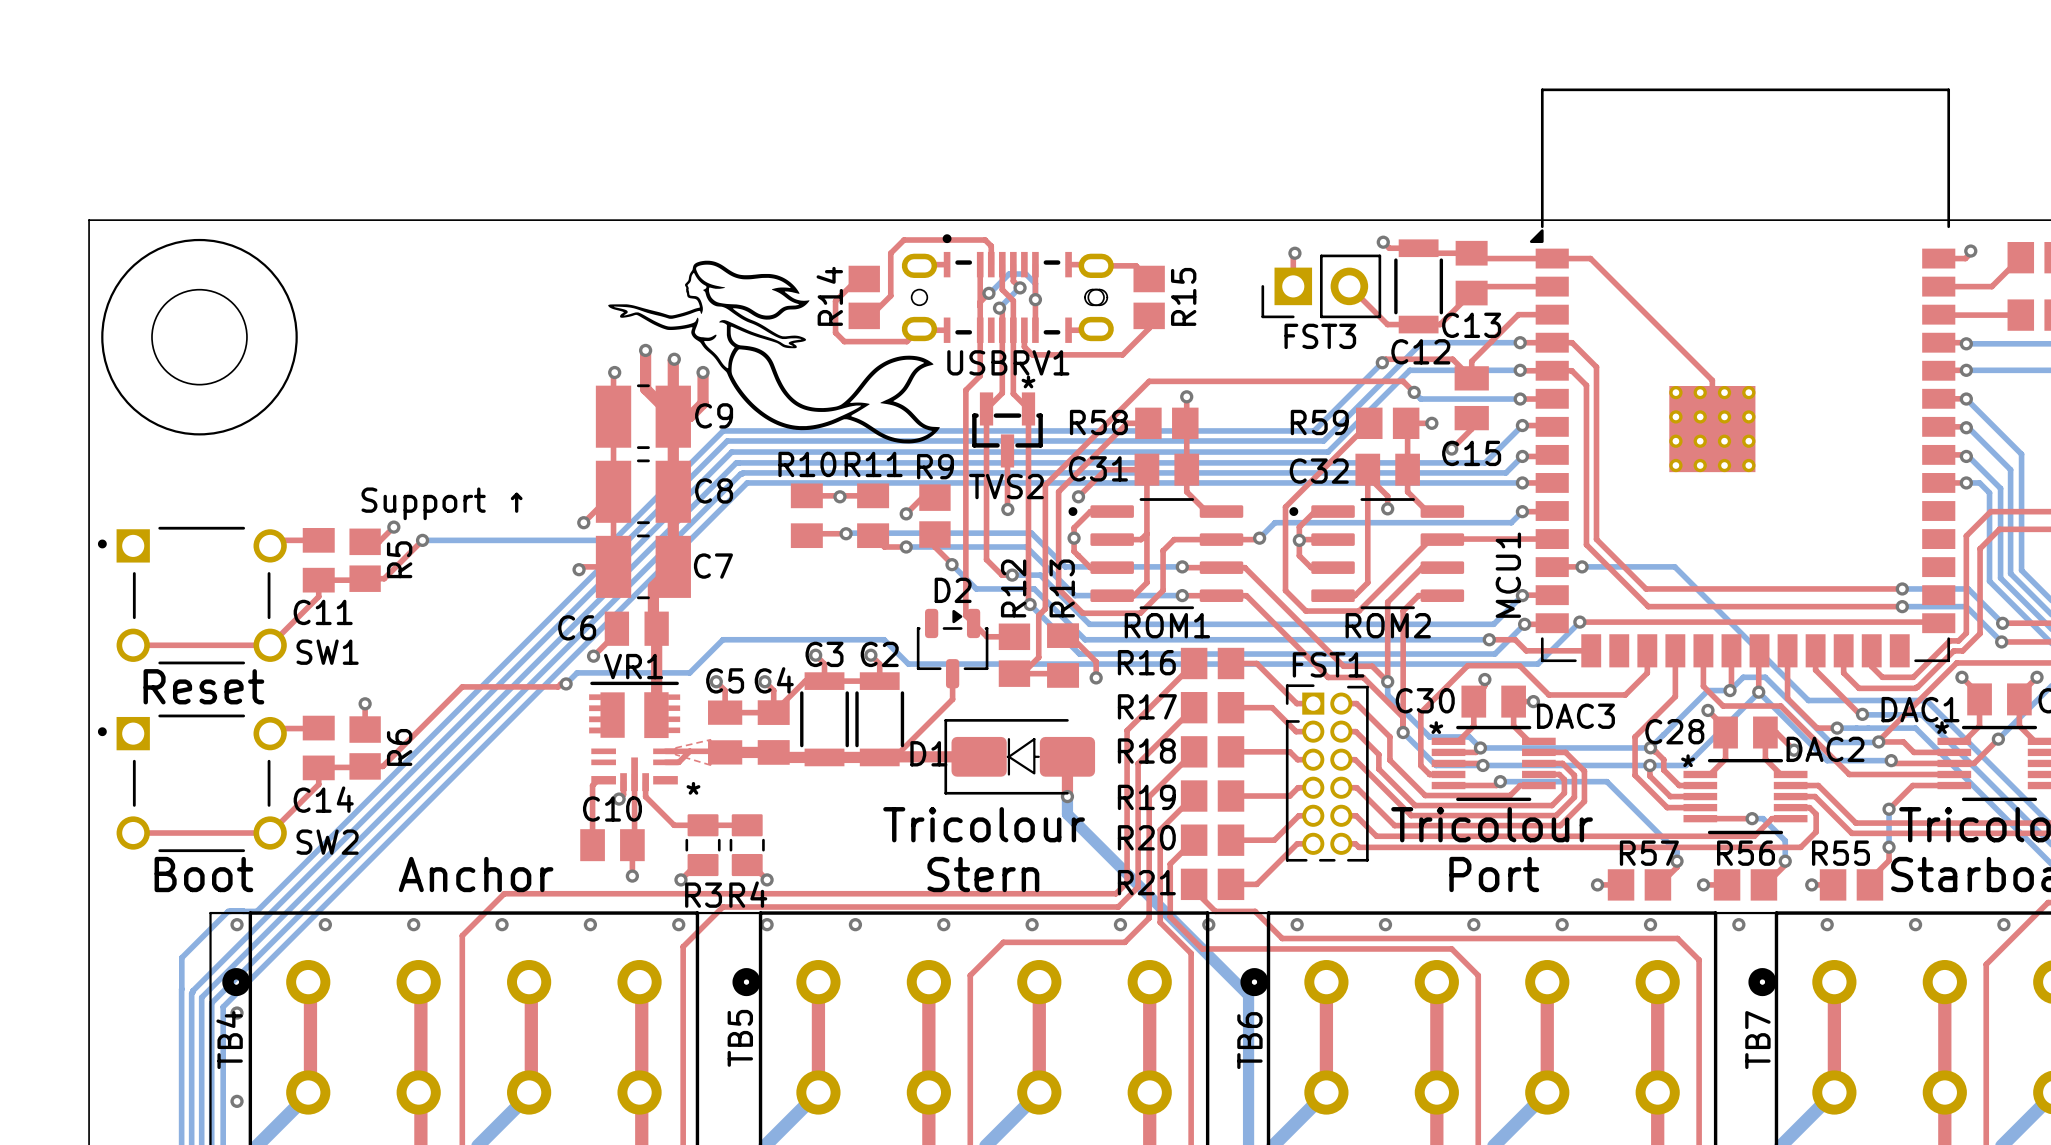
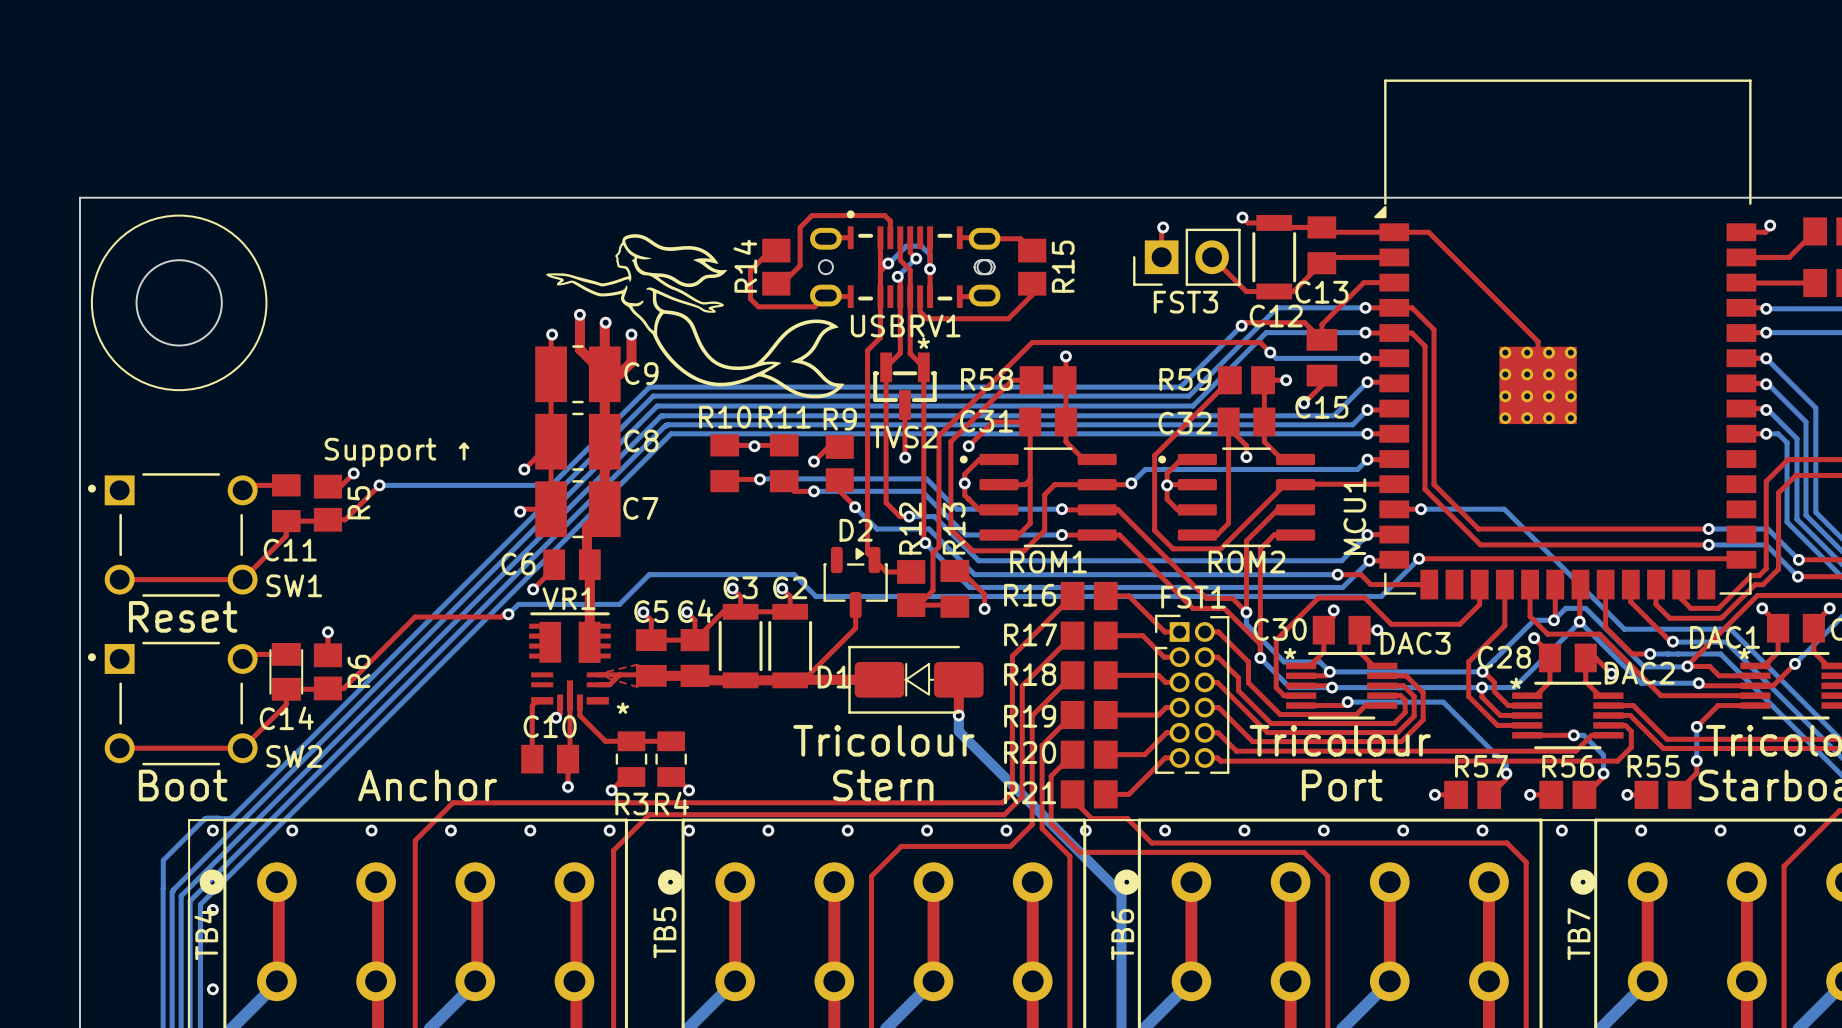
C14 footprint: [302, 715, 335, 781] -> [269, 642, 304, 701]

